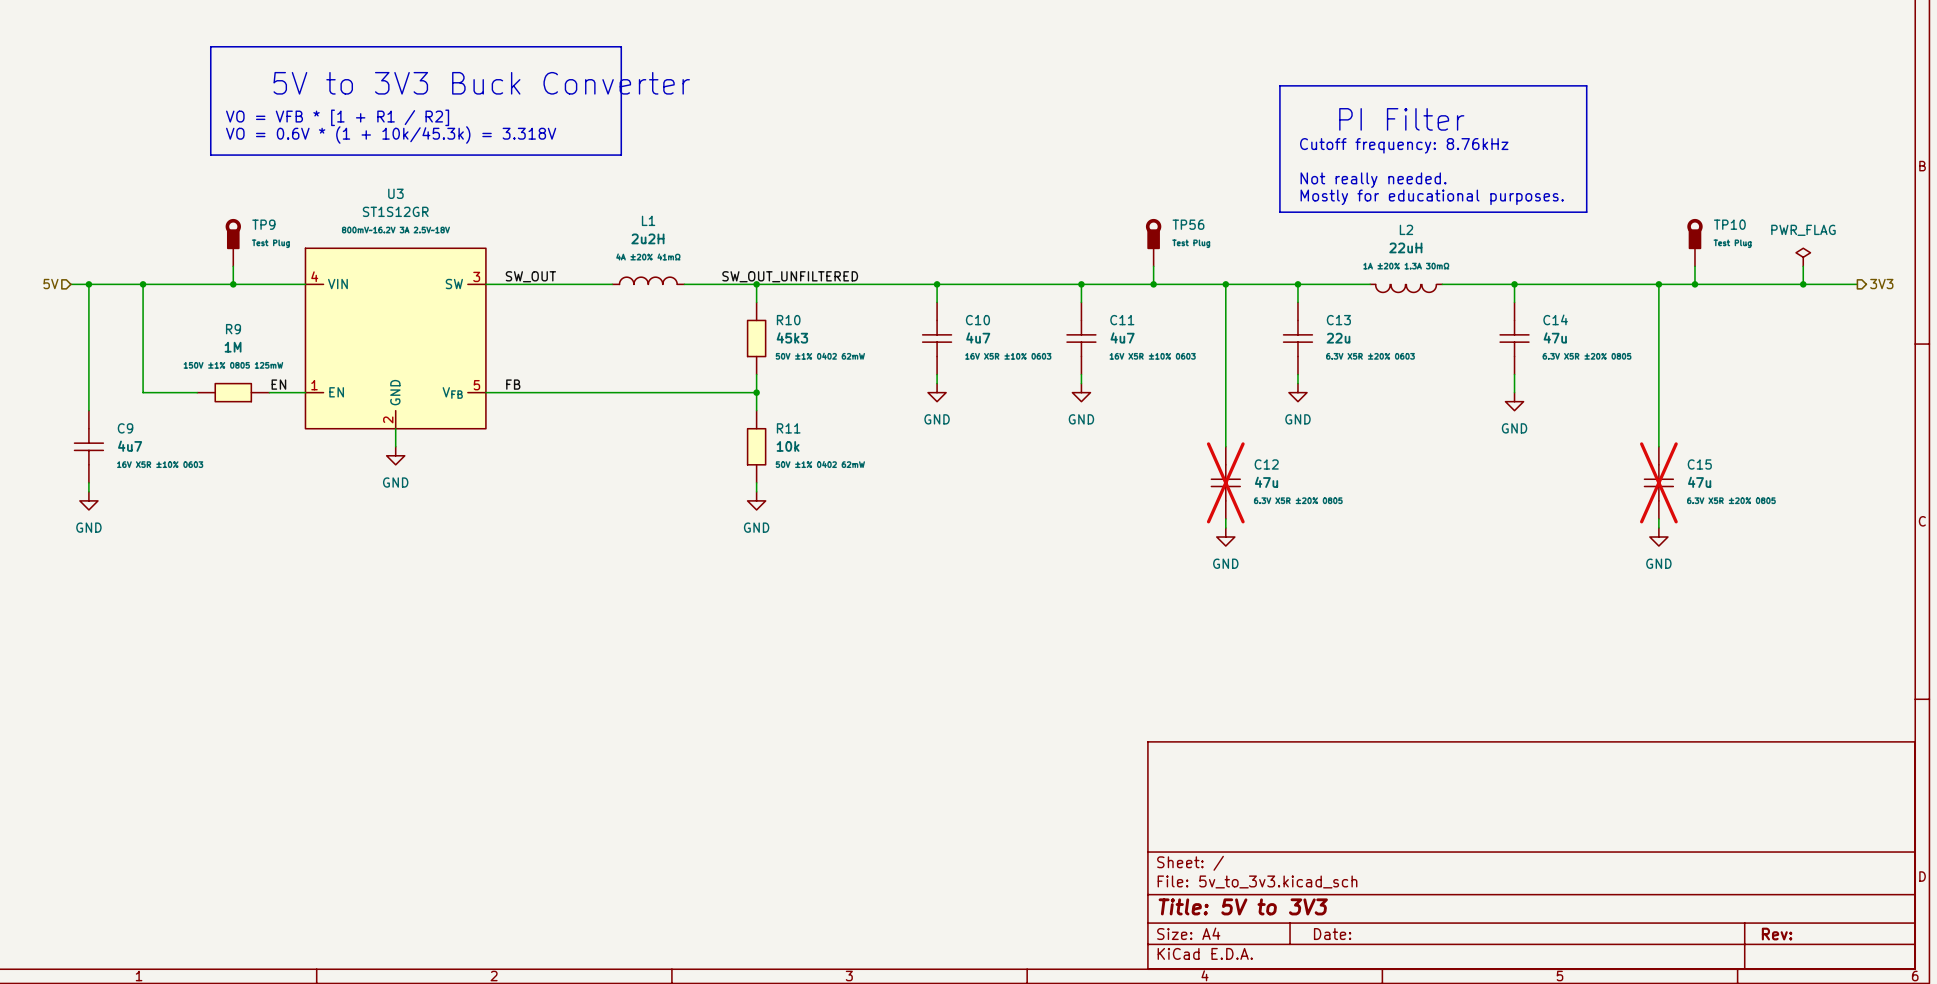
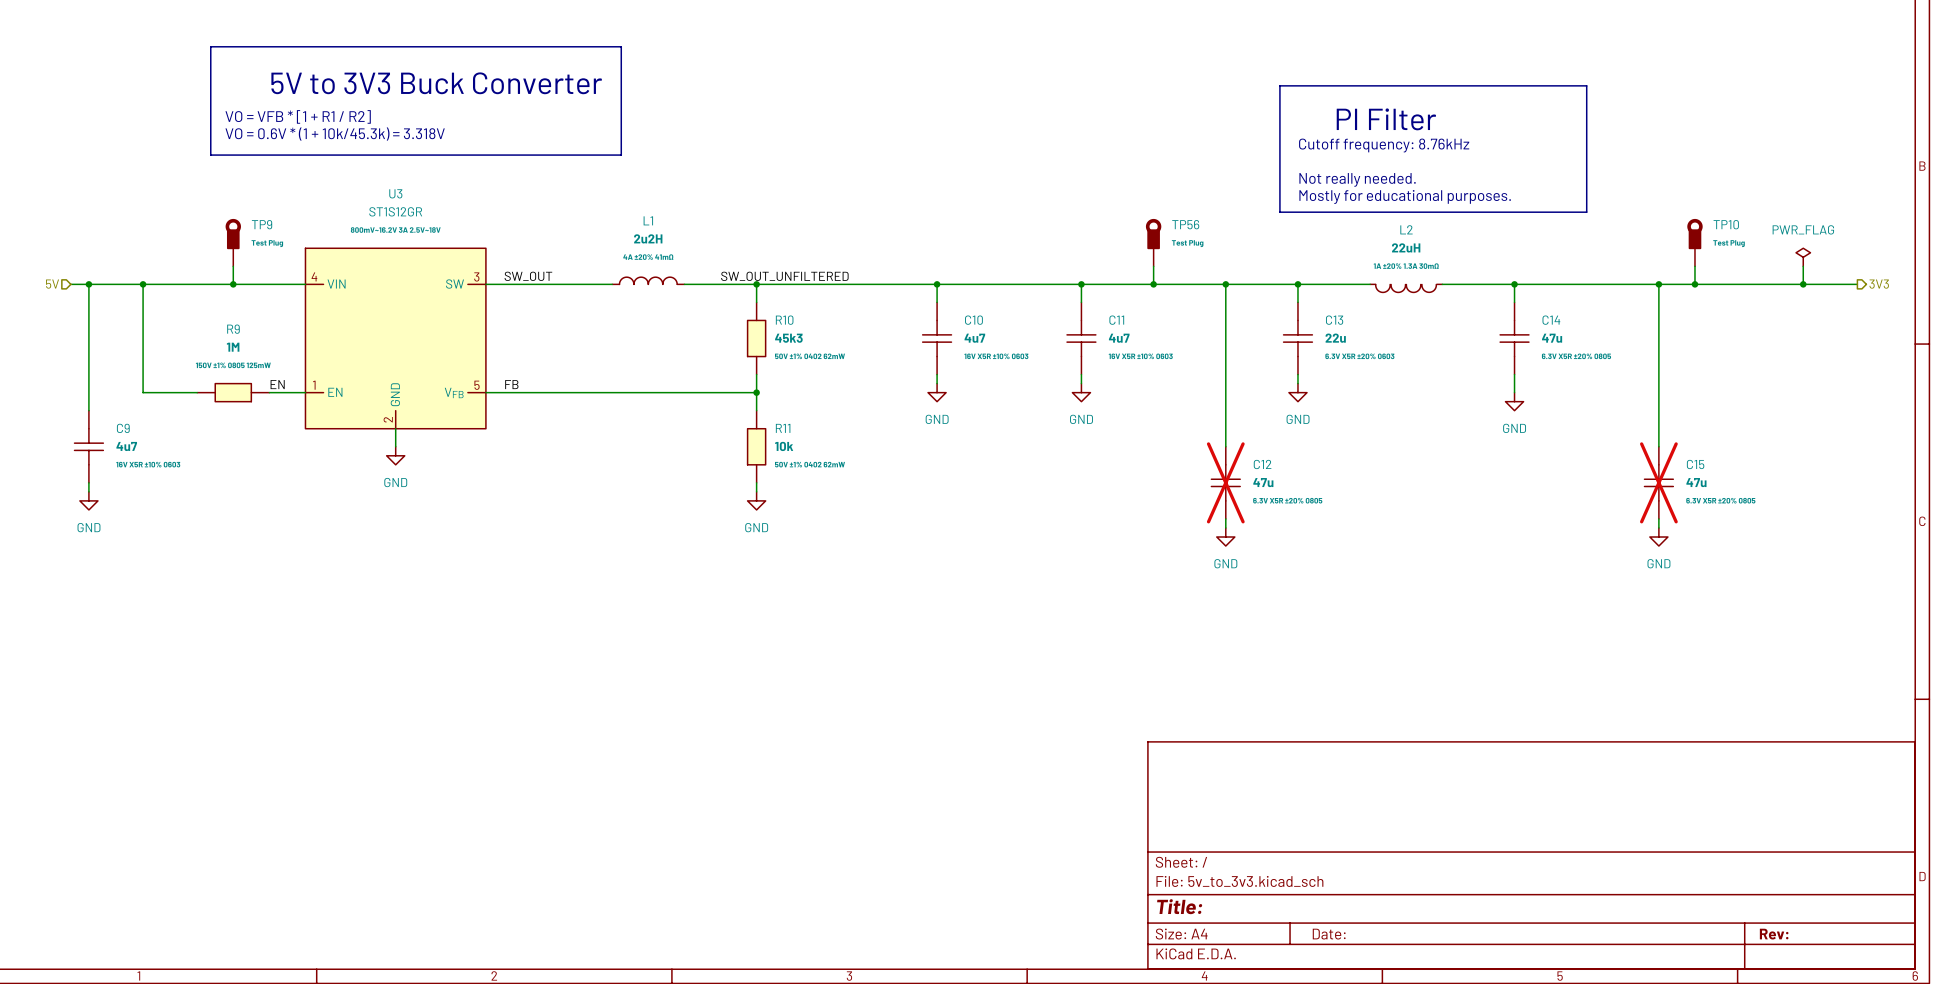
title block: Title: 5V to 3V3 (1243, 906) -> Title: (1179, 906)

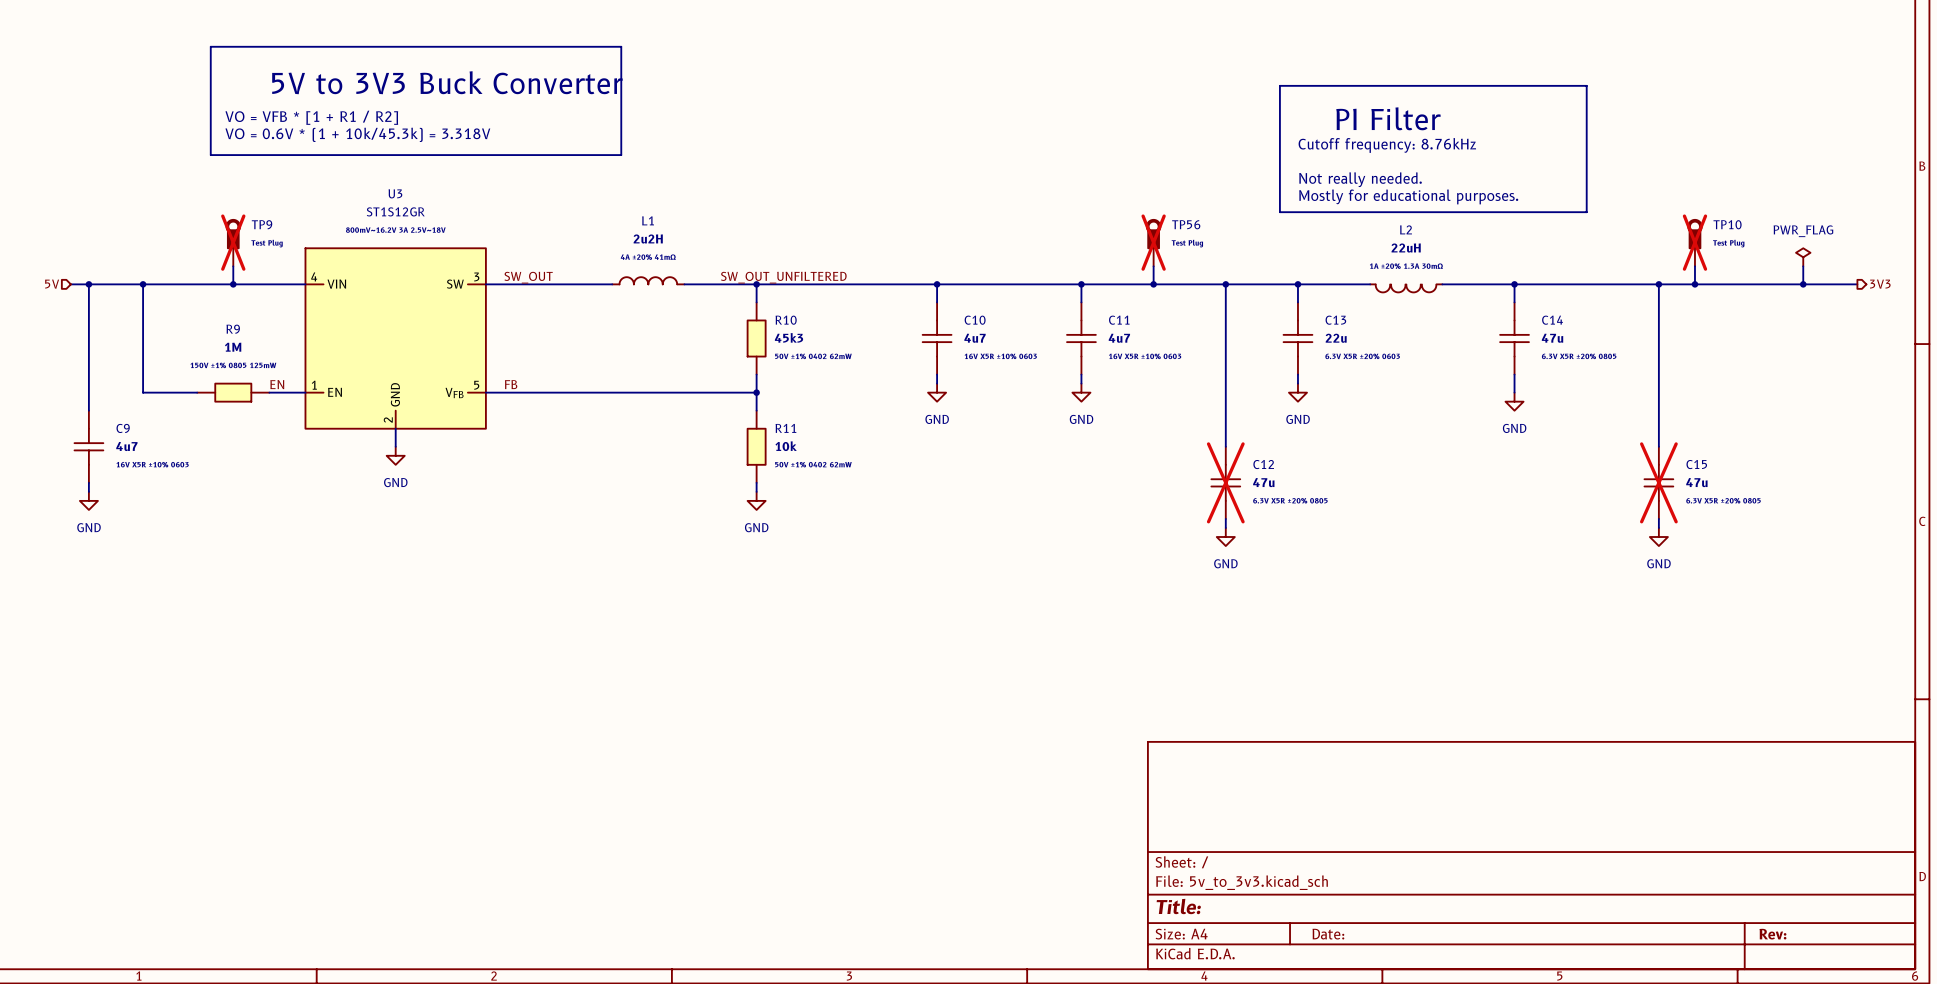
TP9 do-not-place cross: none -> (233, 242)
TP56 do-not-place cross: none -> (1153, 242)
TP10 do-not-place cross: none -> (1694, 242)

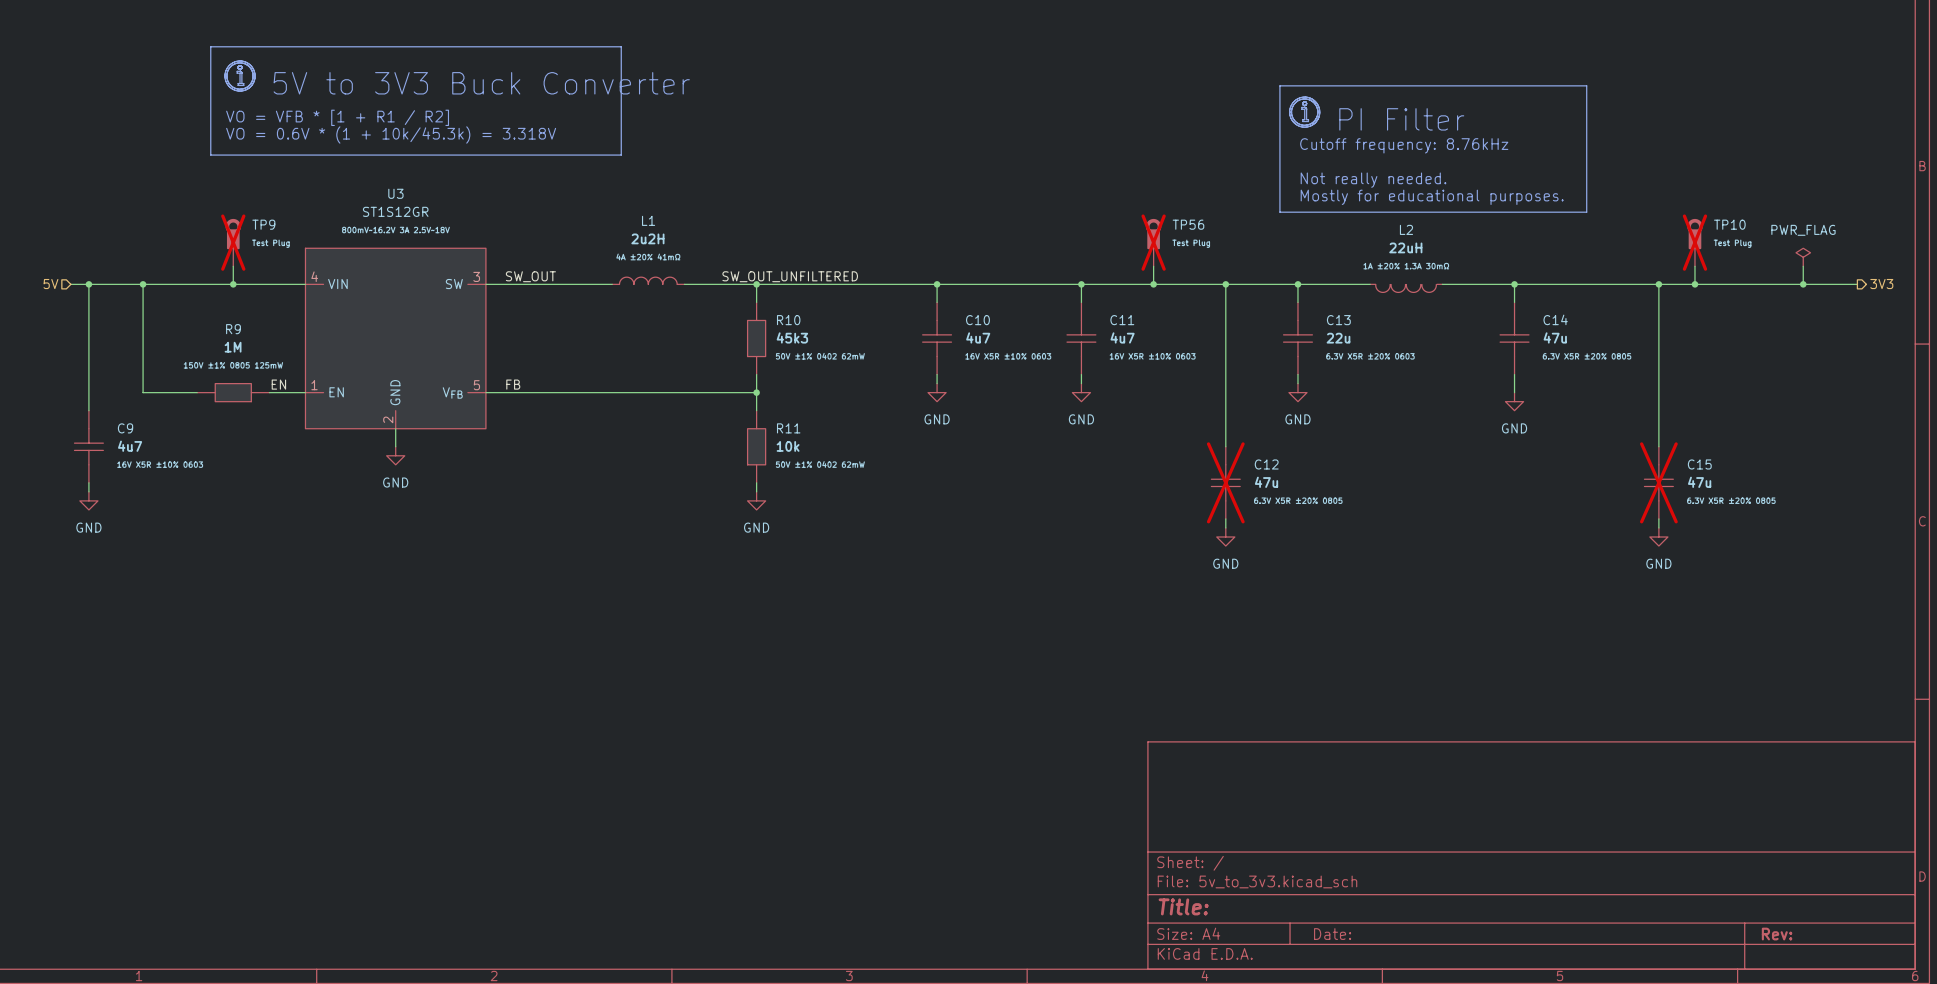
line: none -> (240, 61) (229, 65) (224, 75) (229, 86) (240, 91) (250, 86) (255, 76) (250, 65) (240, 61)
line: none -> (240, 71) (237, 71) (237, 73) (240, 73) (240, 83) (238, 85) (243, 85) (241, 83) (241, 73)
line: none -> (226, 76) (231, 85) (240, 89) (249, 84) (253, 75) (248, 66) (239, 62) (230, 66) (226, 76)
line: none -> (1304, 107) (1301, 107) (1301, 109) (1304, 109) (1304, 119) (1302, 121) (1308, 121) (1306, 119) (1306, 109)
line: none -> (1289, 112) (1294, 122) (1305, 127) (1315, 122) (1319, 112) (1315, 101) (1304, 97) (1293, 101) (1289, 112)
line: none -> (1291, 112) (1295, 121) (1305, 125) (1314, 120) (1317, 111) (1313, 102) (1304, 98) (1295, 102) (1291, 112)

